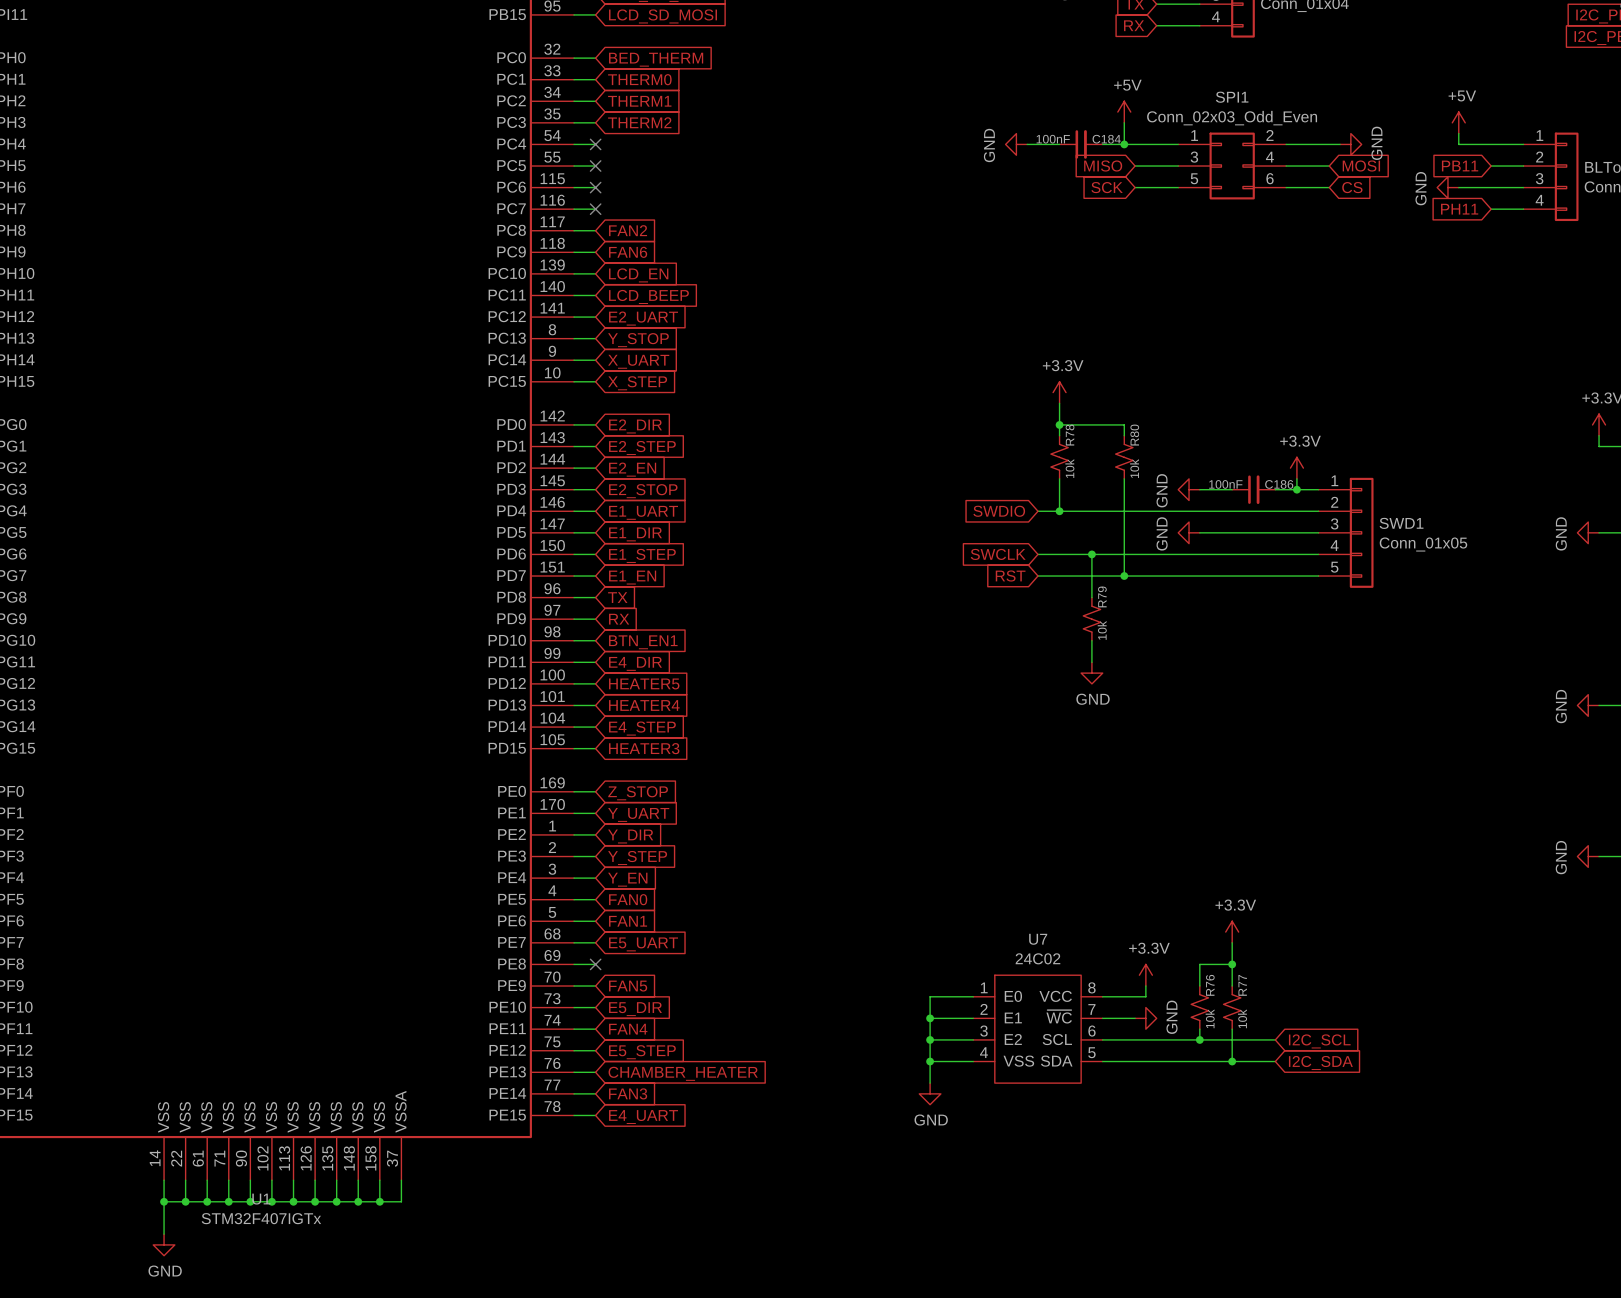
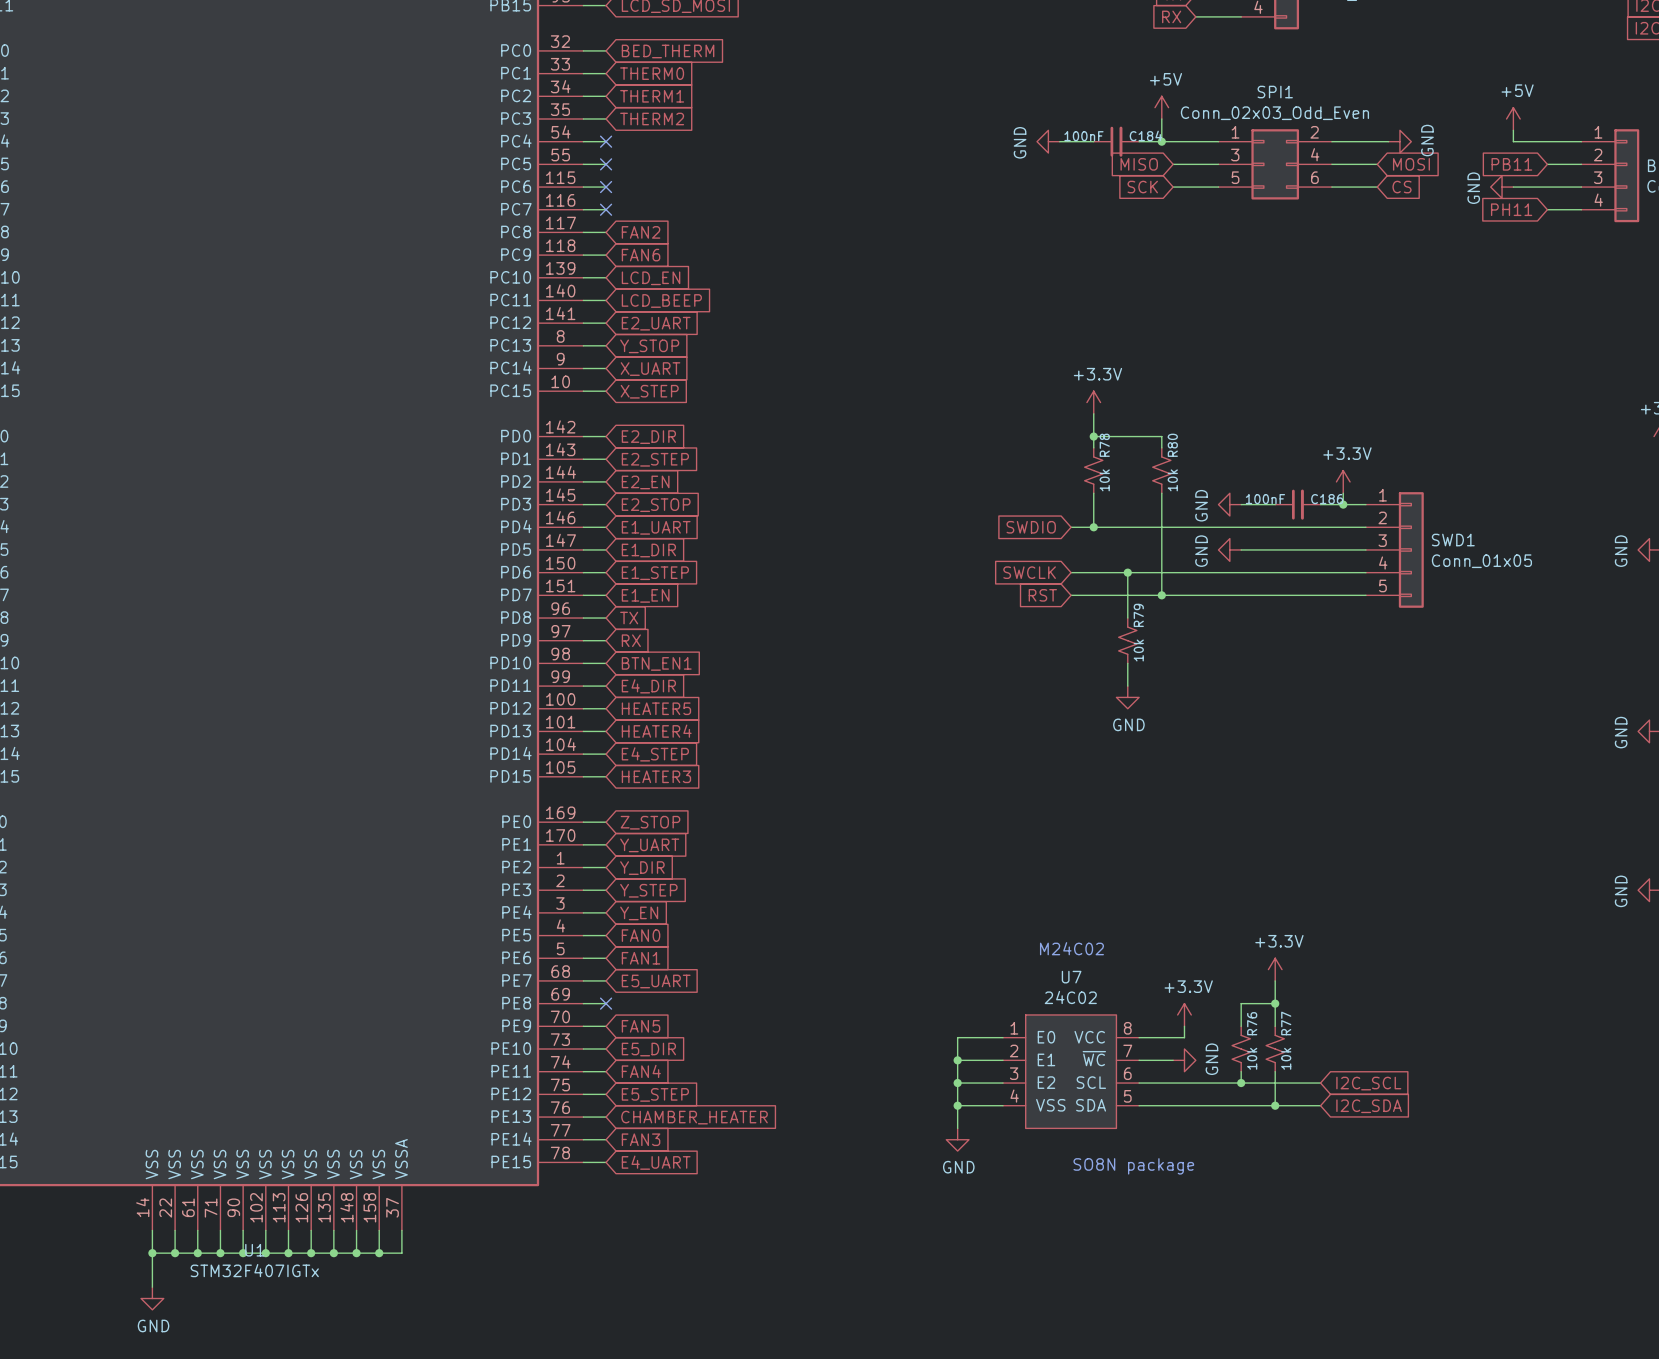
text: none -> M24C02 (1071, 948)
text: none -> SO8N package (1133, 1166)

